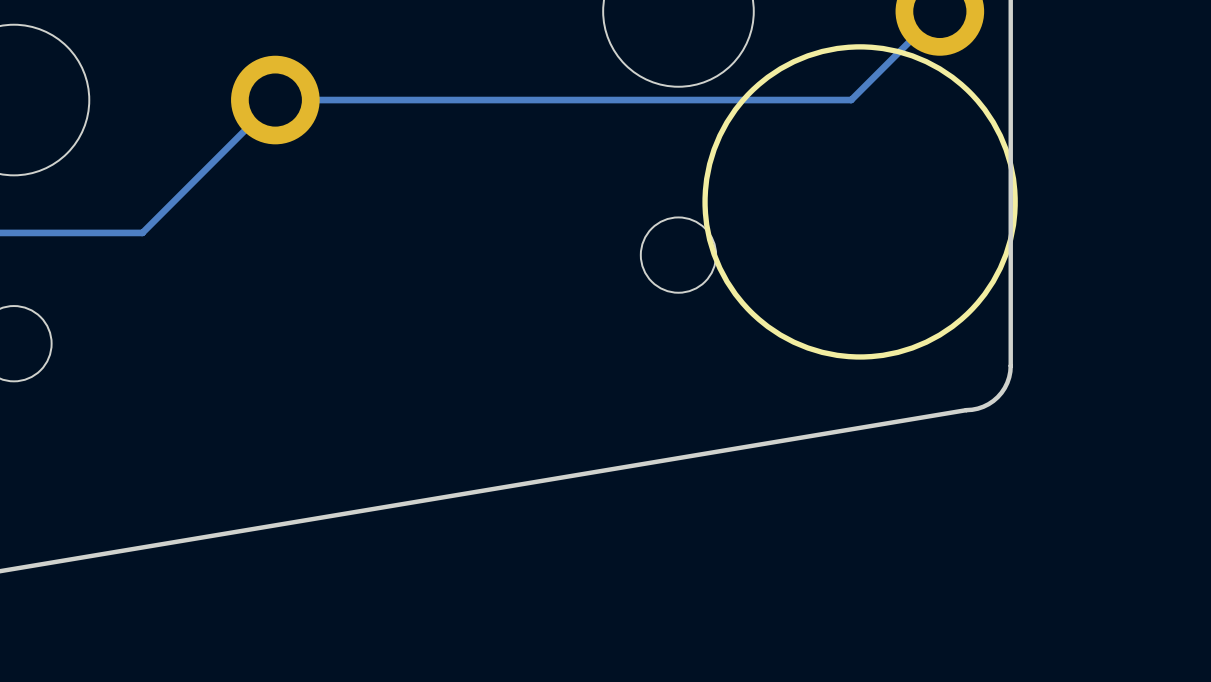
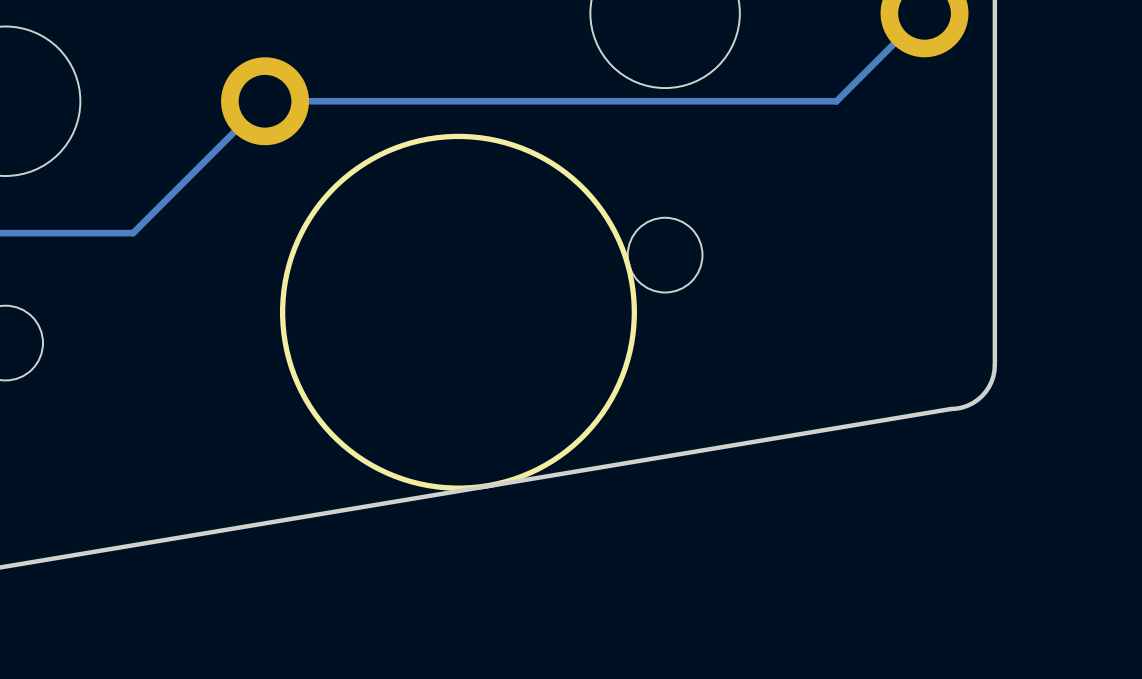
drawing: [702, 44, 1018, 360] -> none
drawing: none -> [279, 133, 637, 491]

